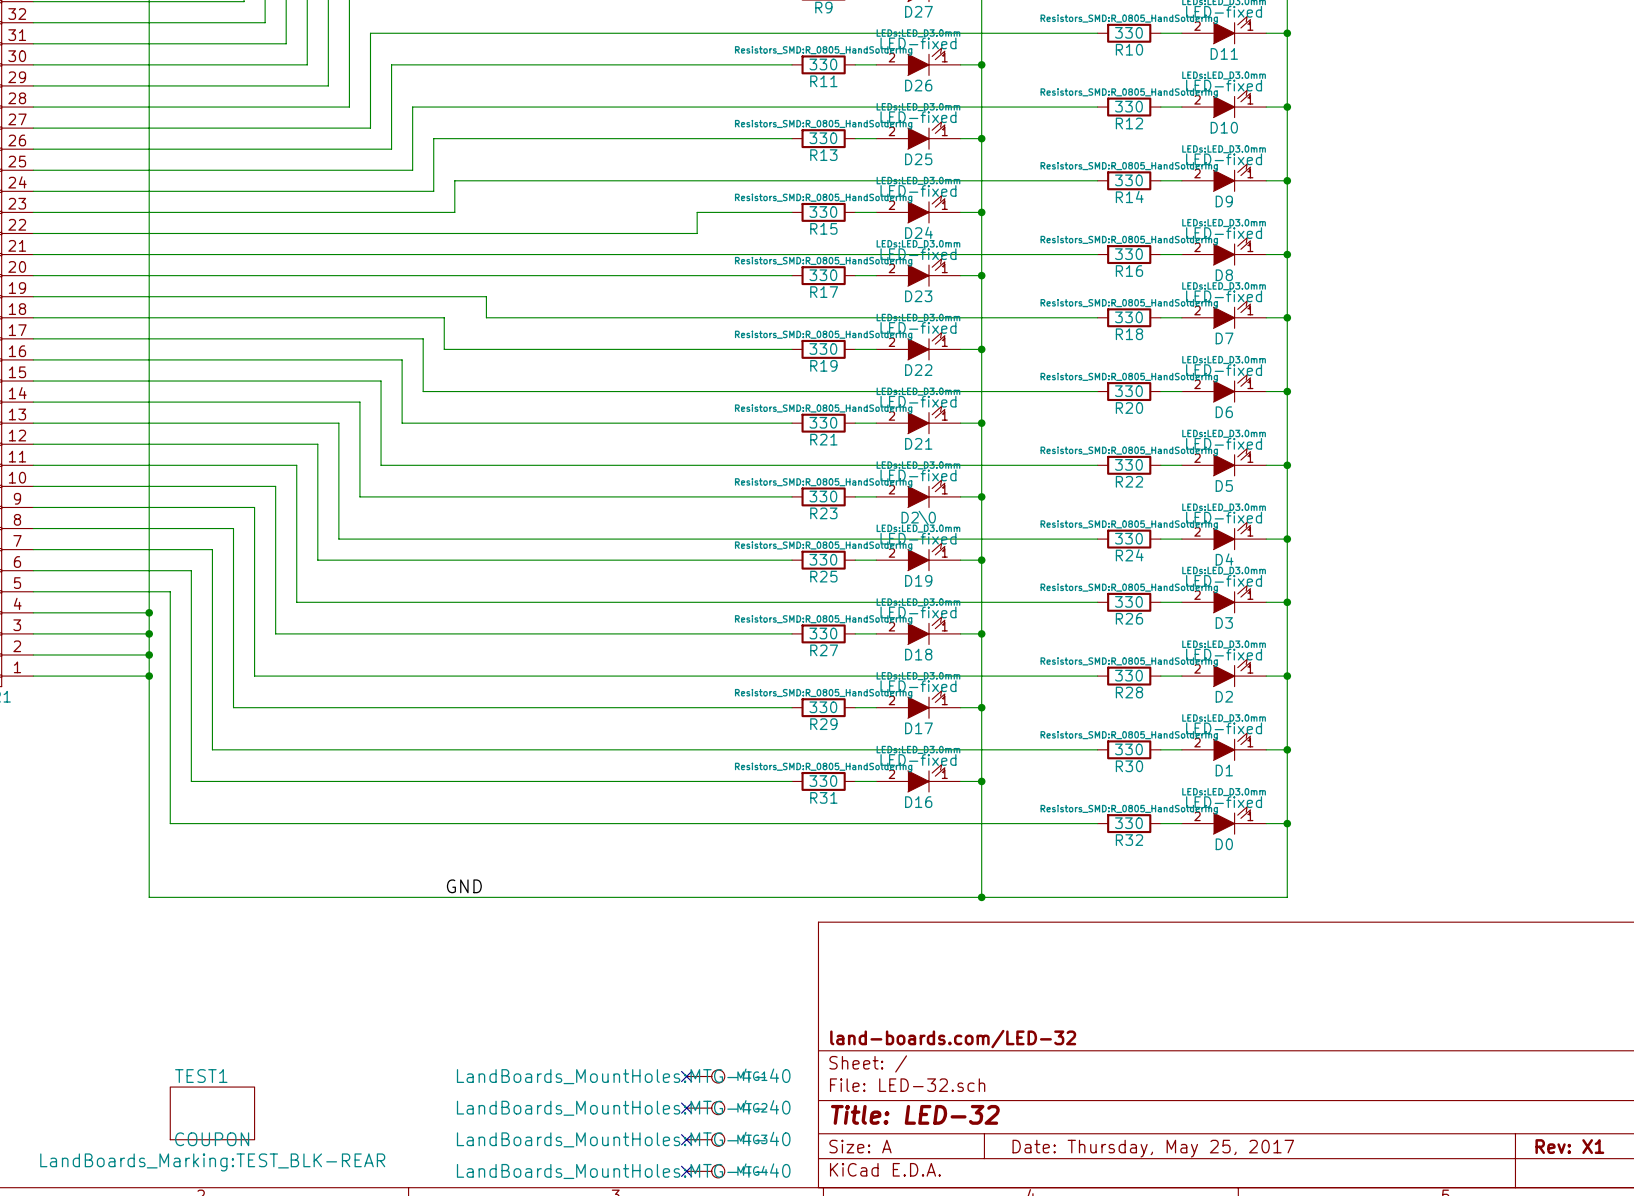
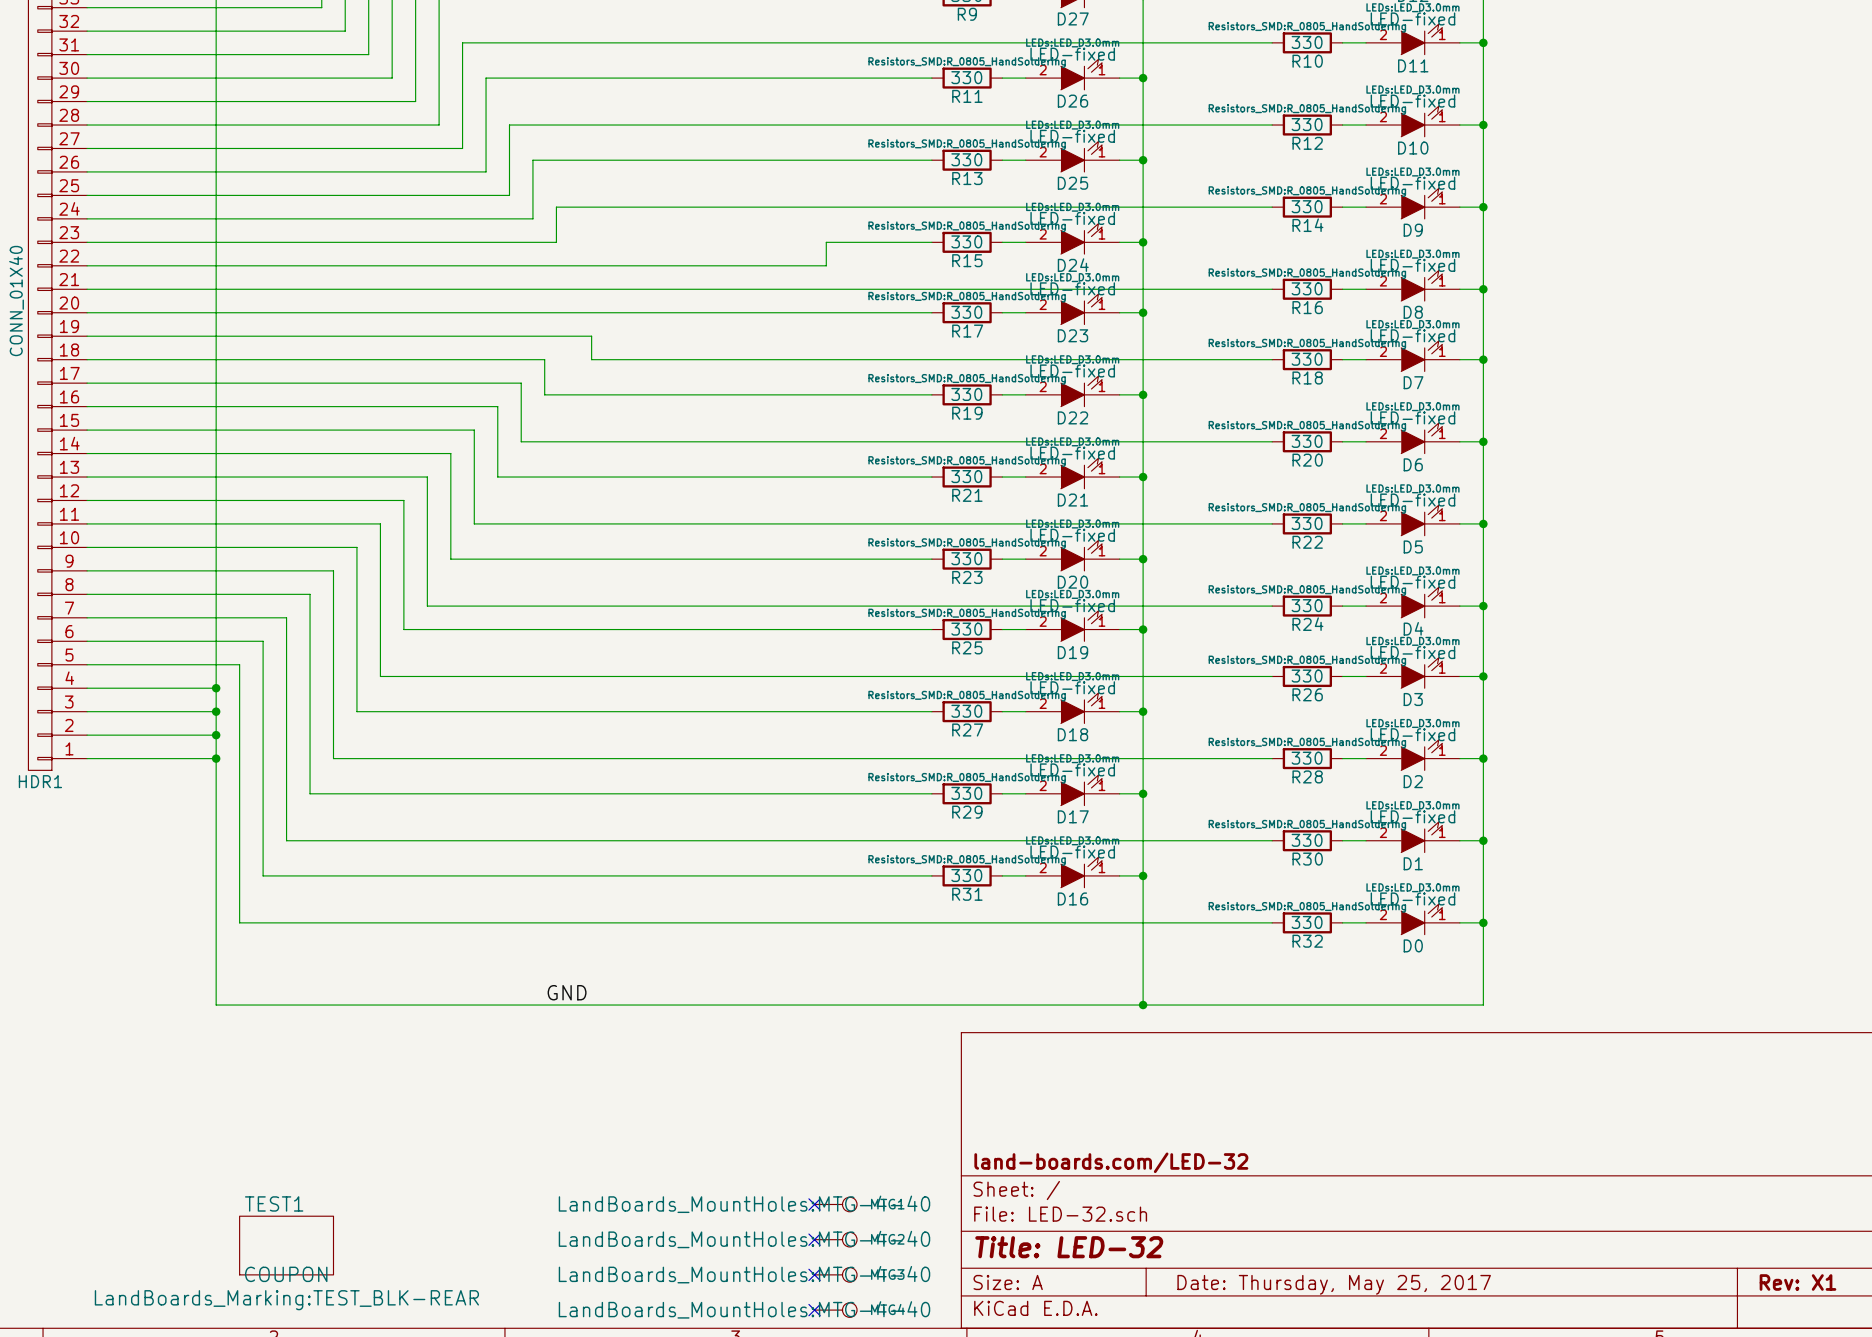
D2\0 name: D2\0 (918, 518) -> D20 (1072, 582)

